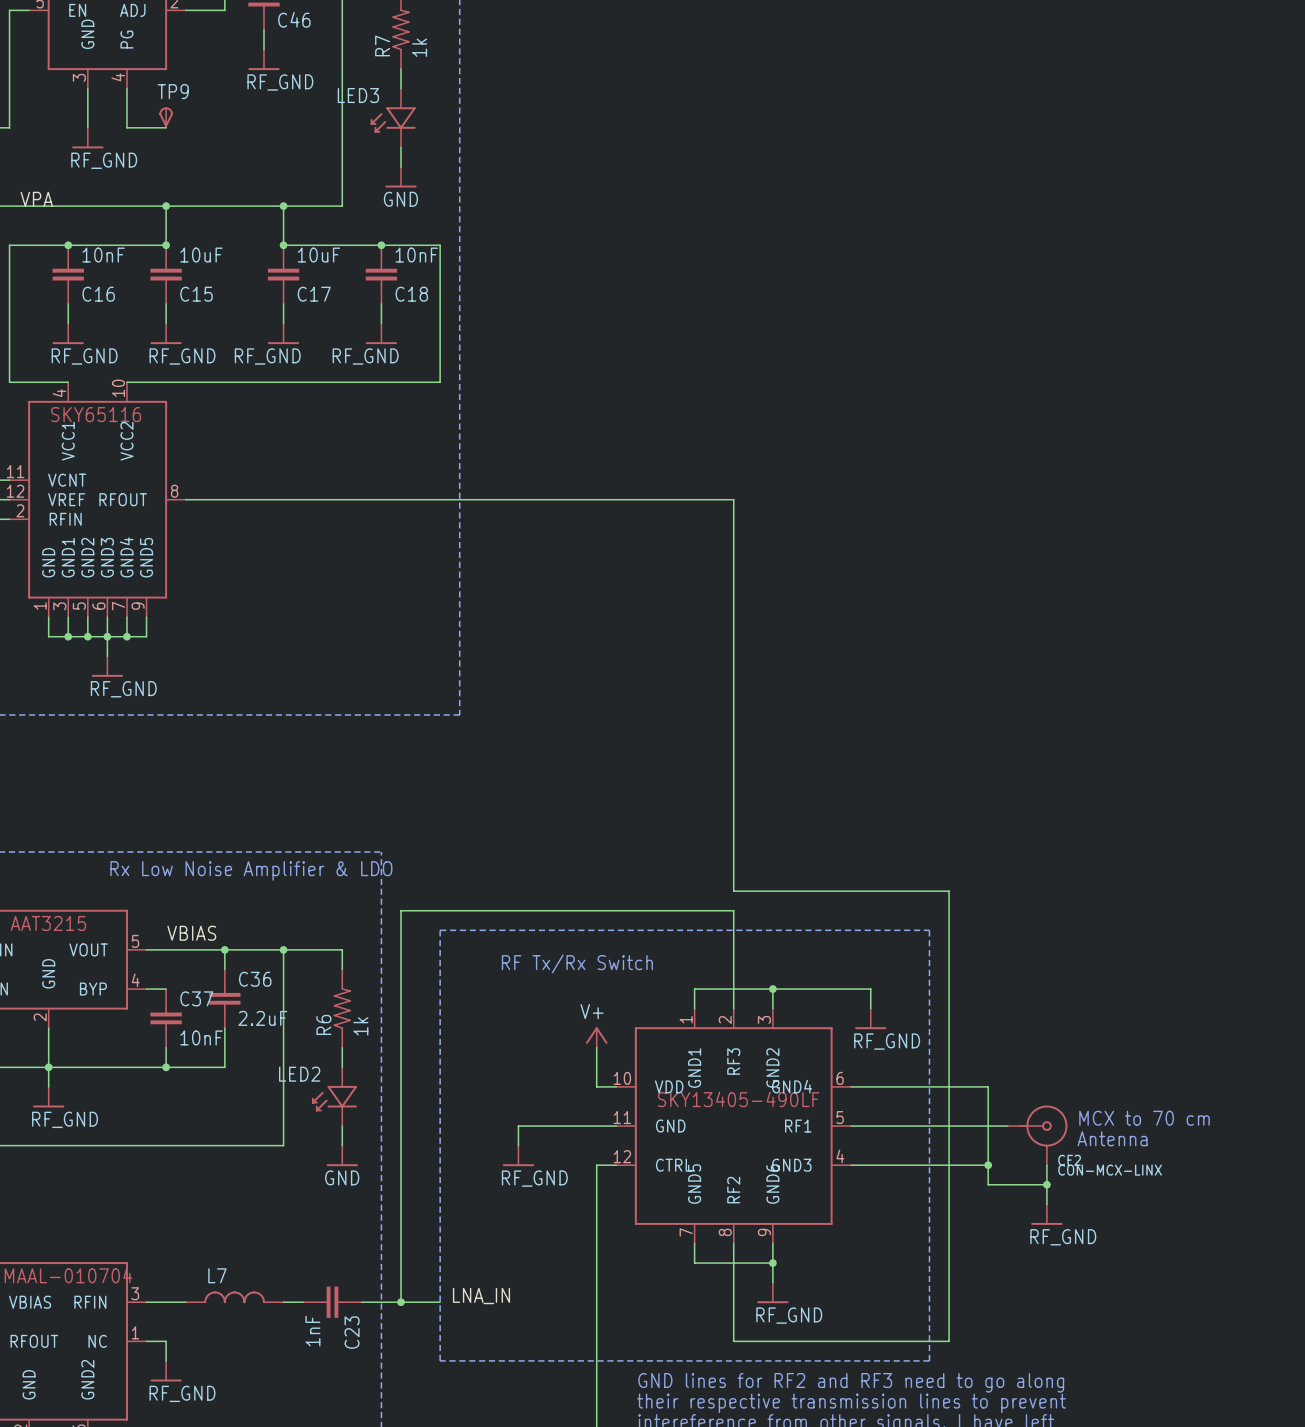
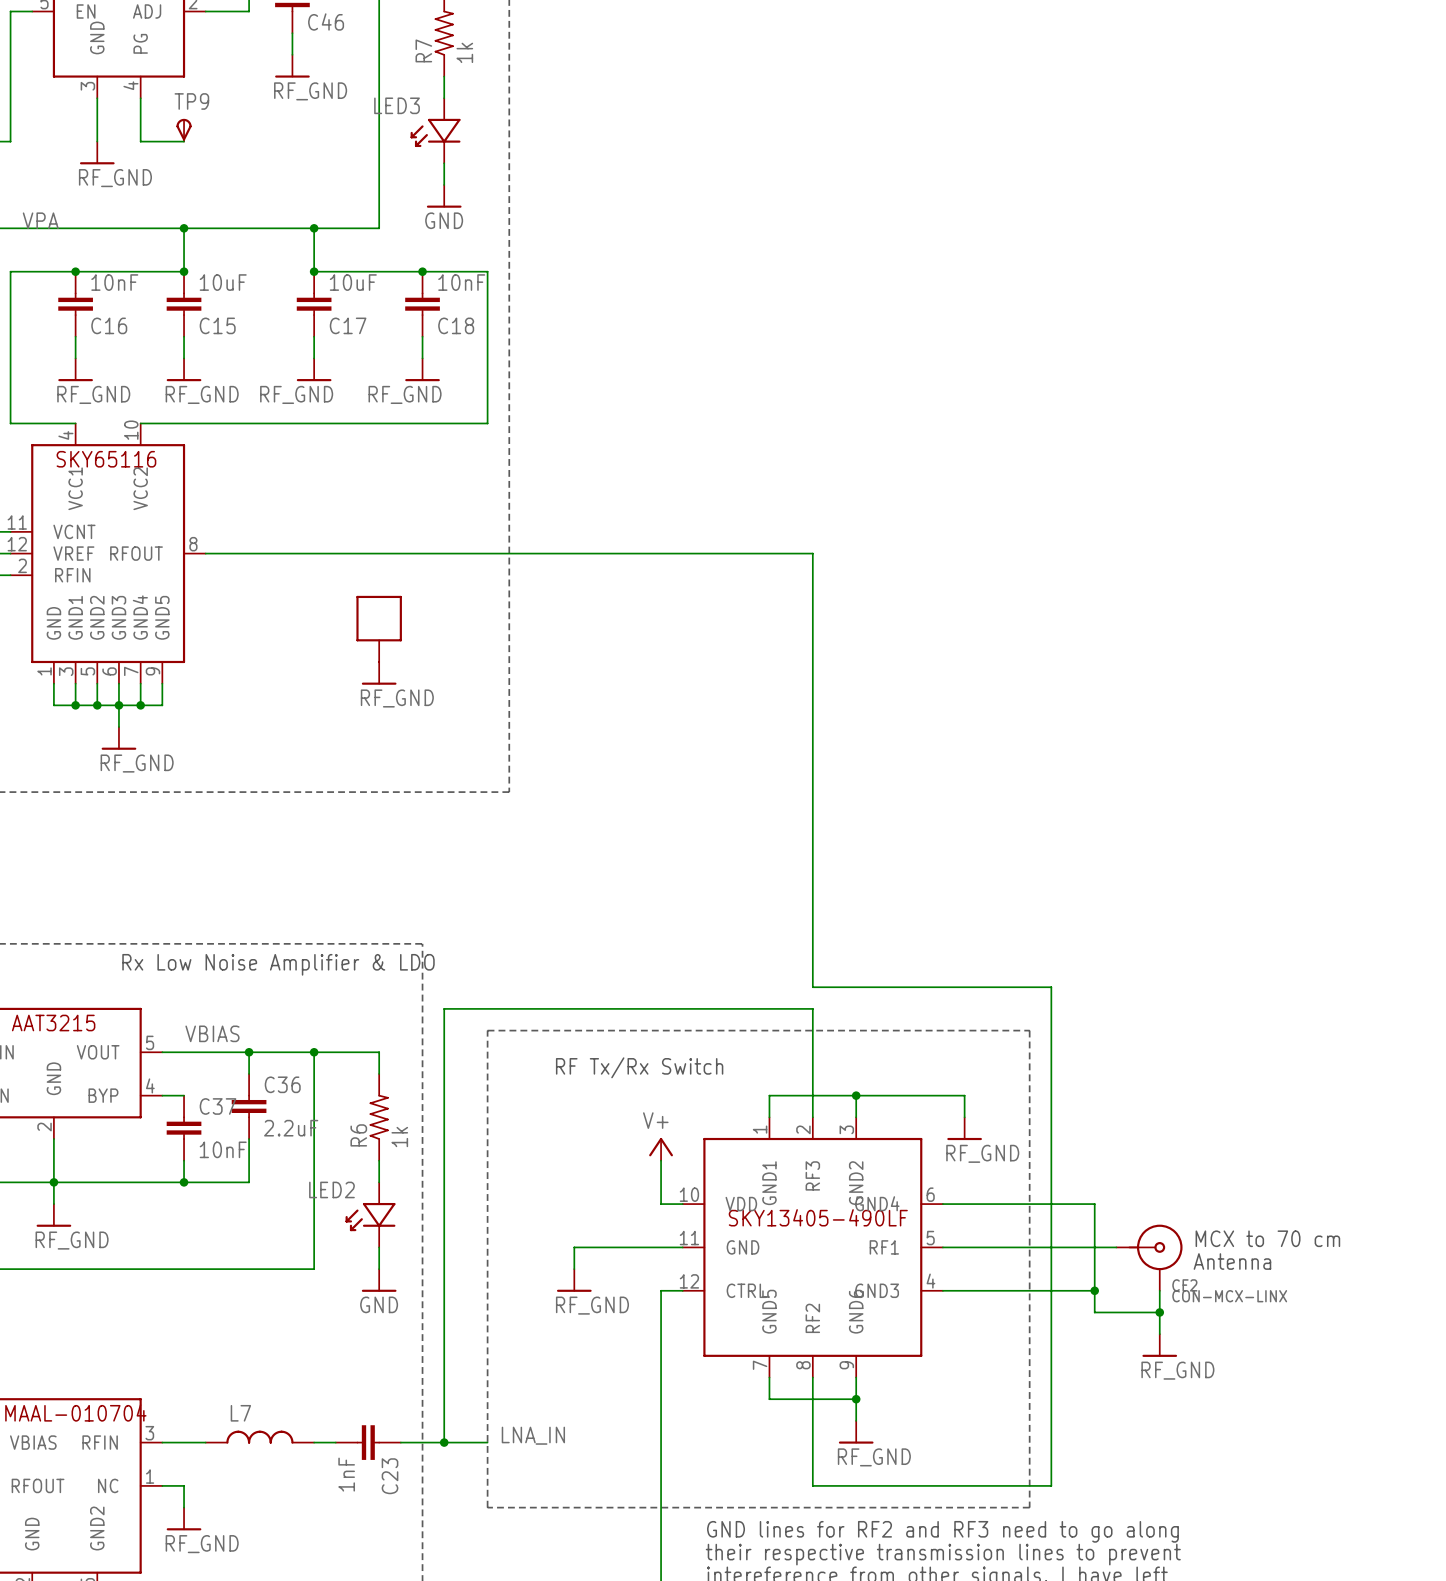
part: none -> (379, 628)
power symbol: none -> RF_GND (379, 673)

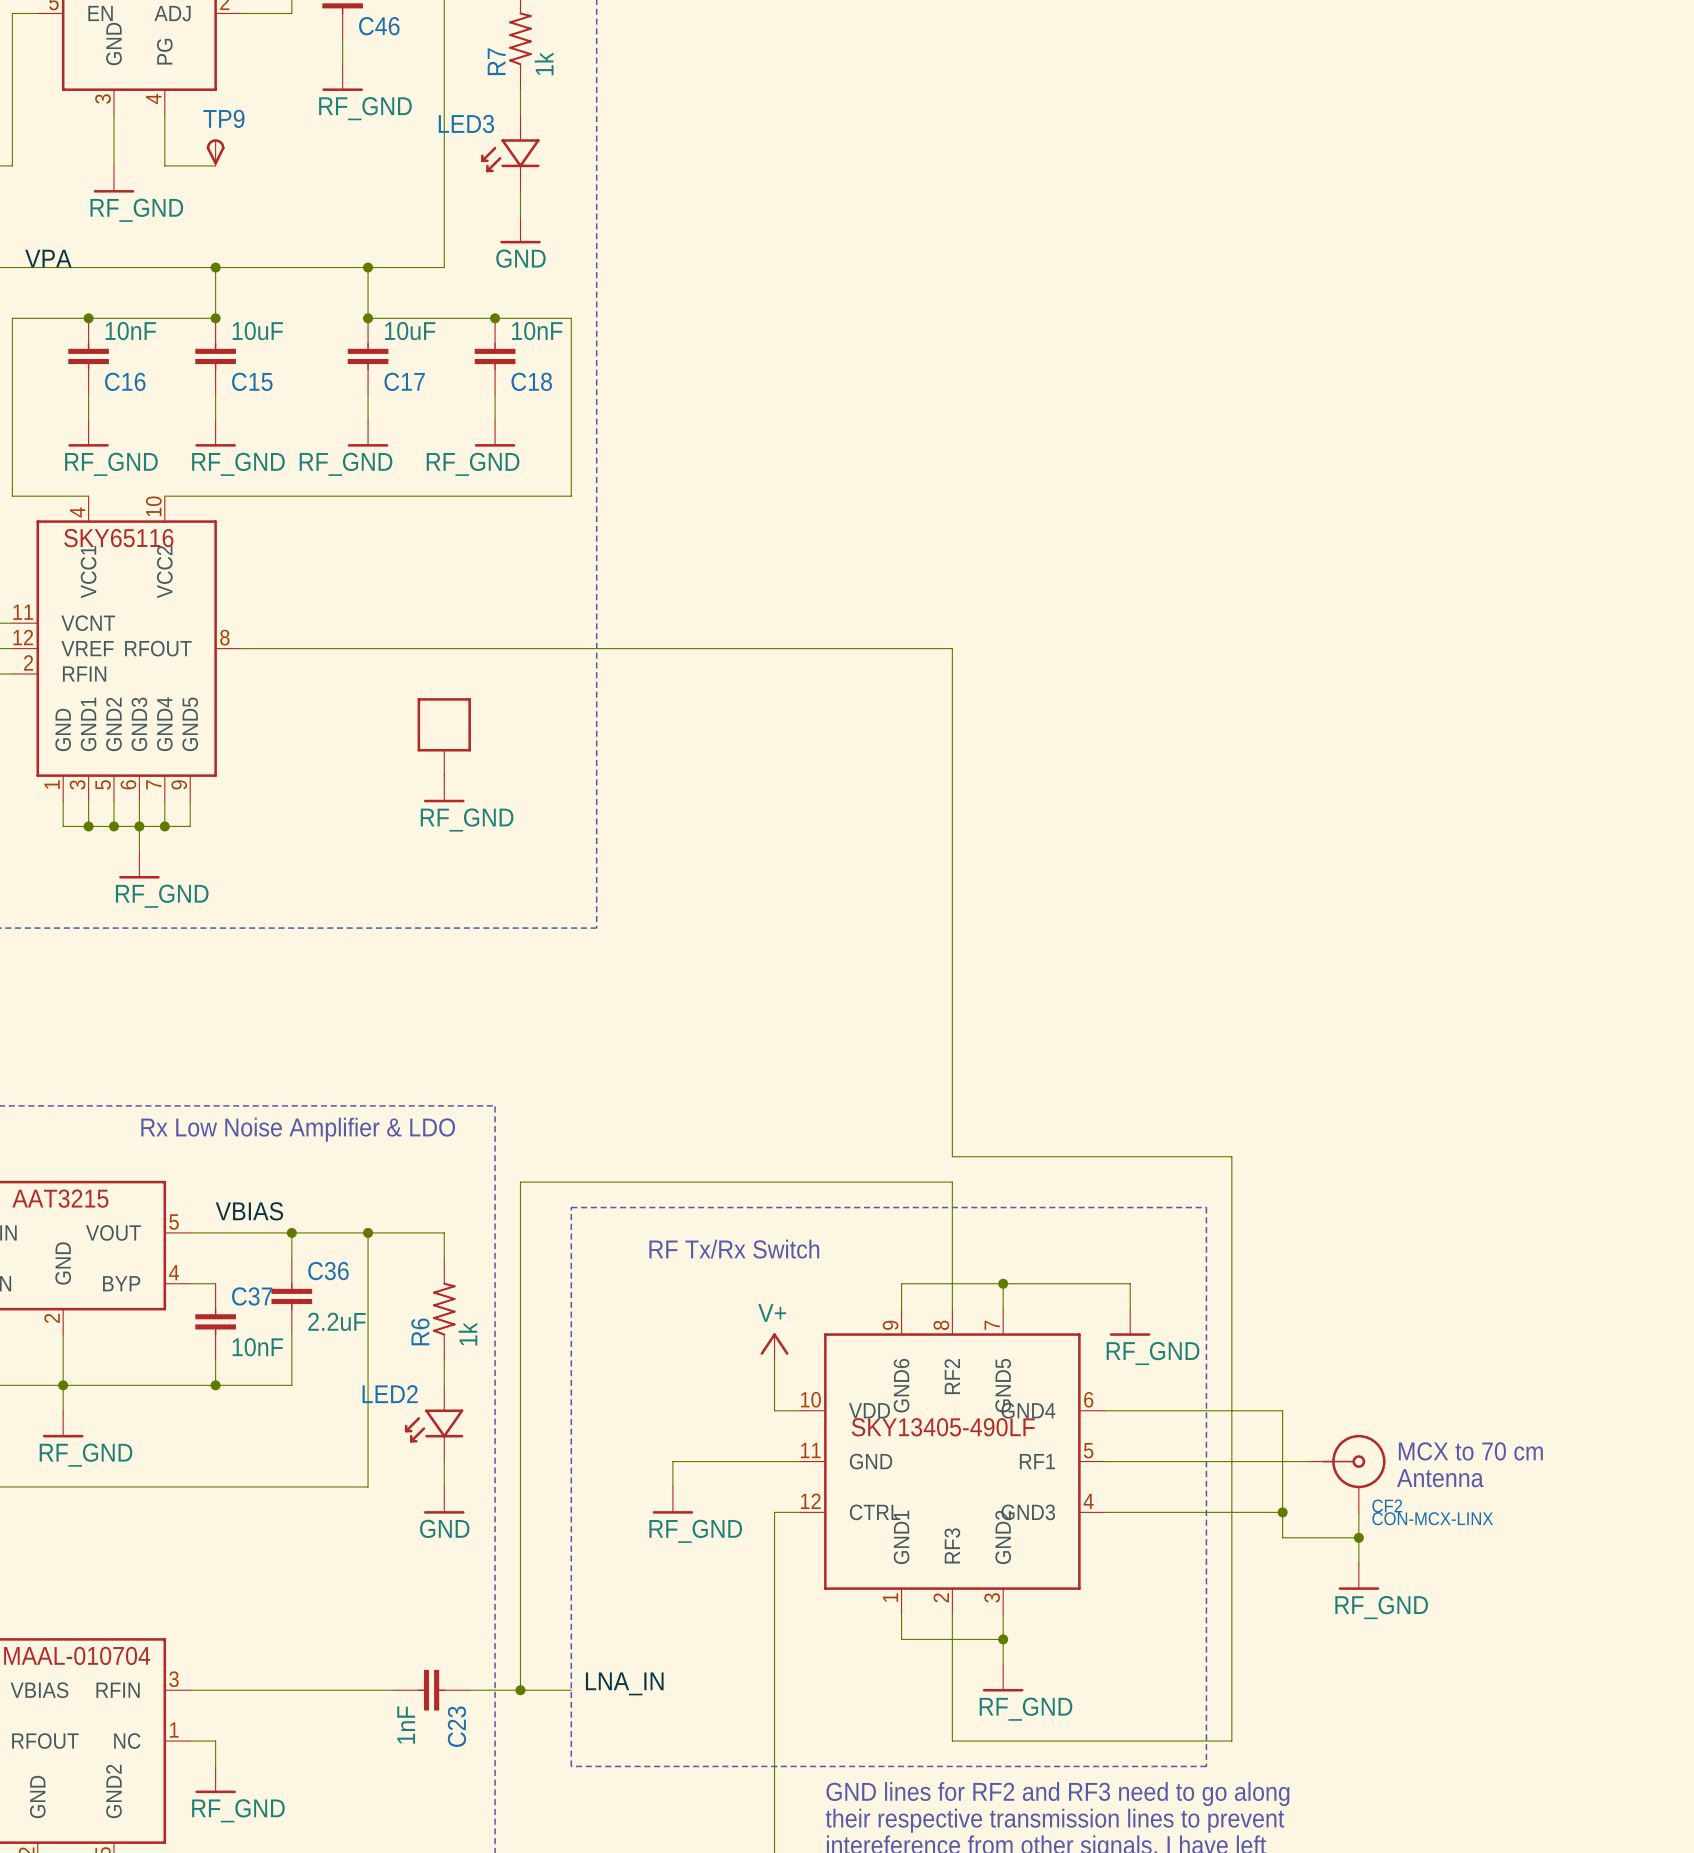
part symbol: [682, 1117, 943, 1378] -> [799, 1309, 1105, 1615]
L7: (259, 1437) -> none
wire: none -> (241, 1690) (368, 1690)

